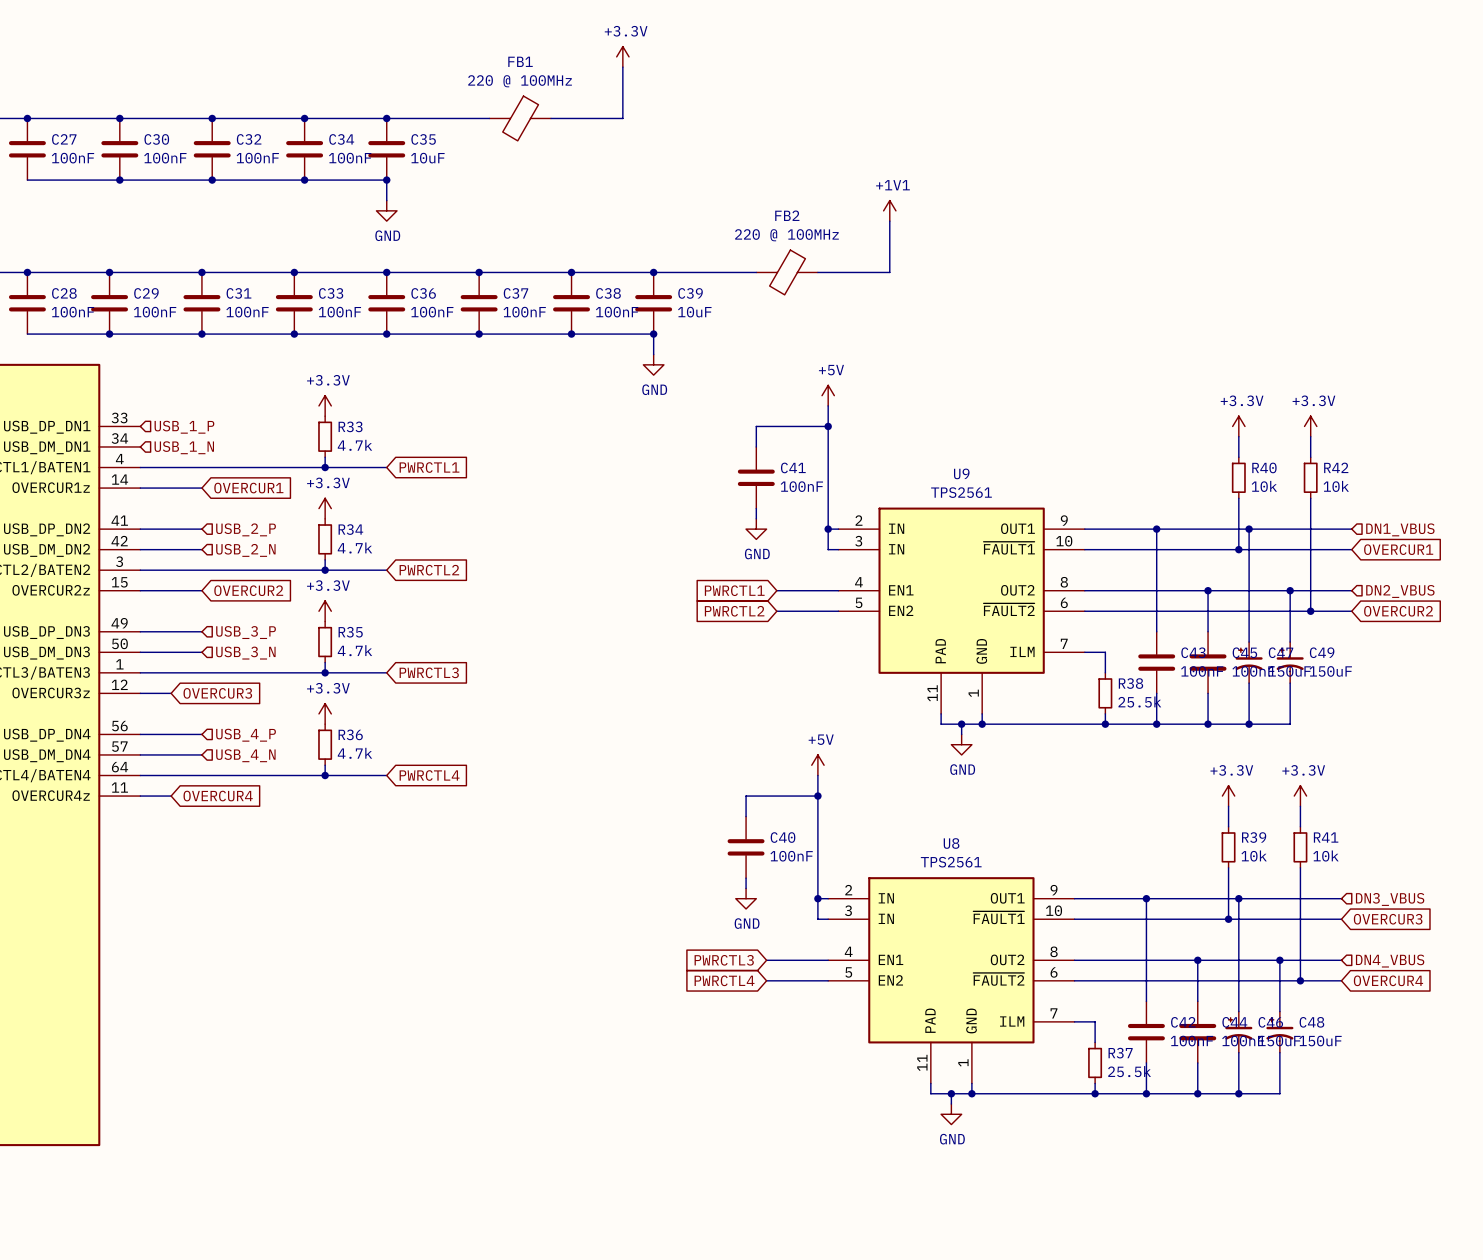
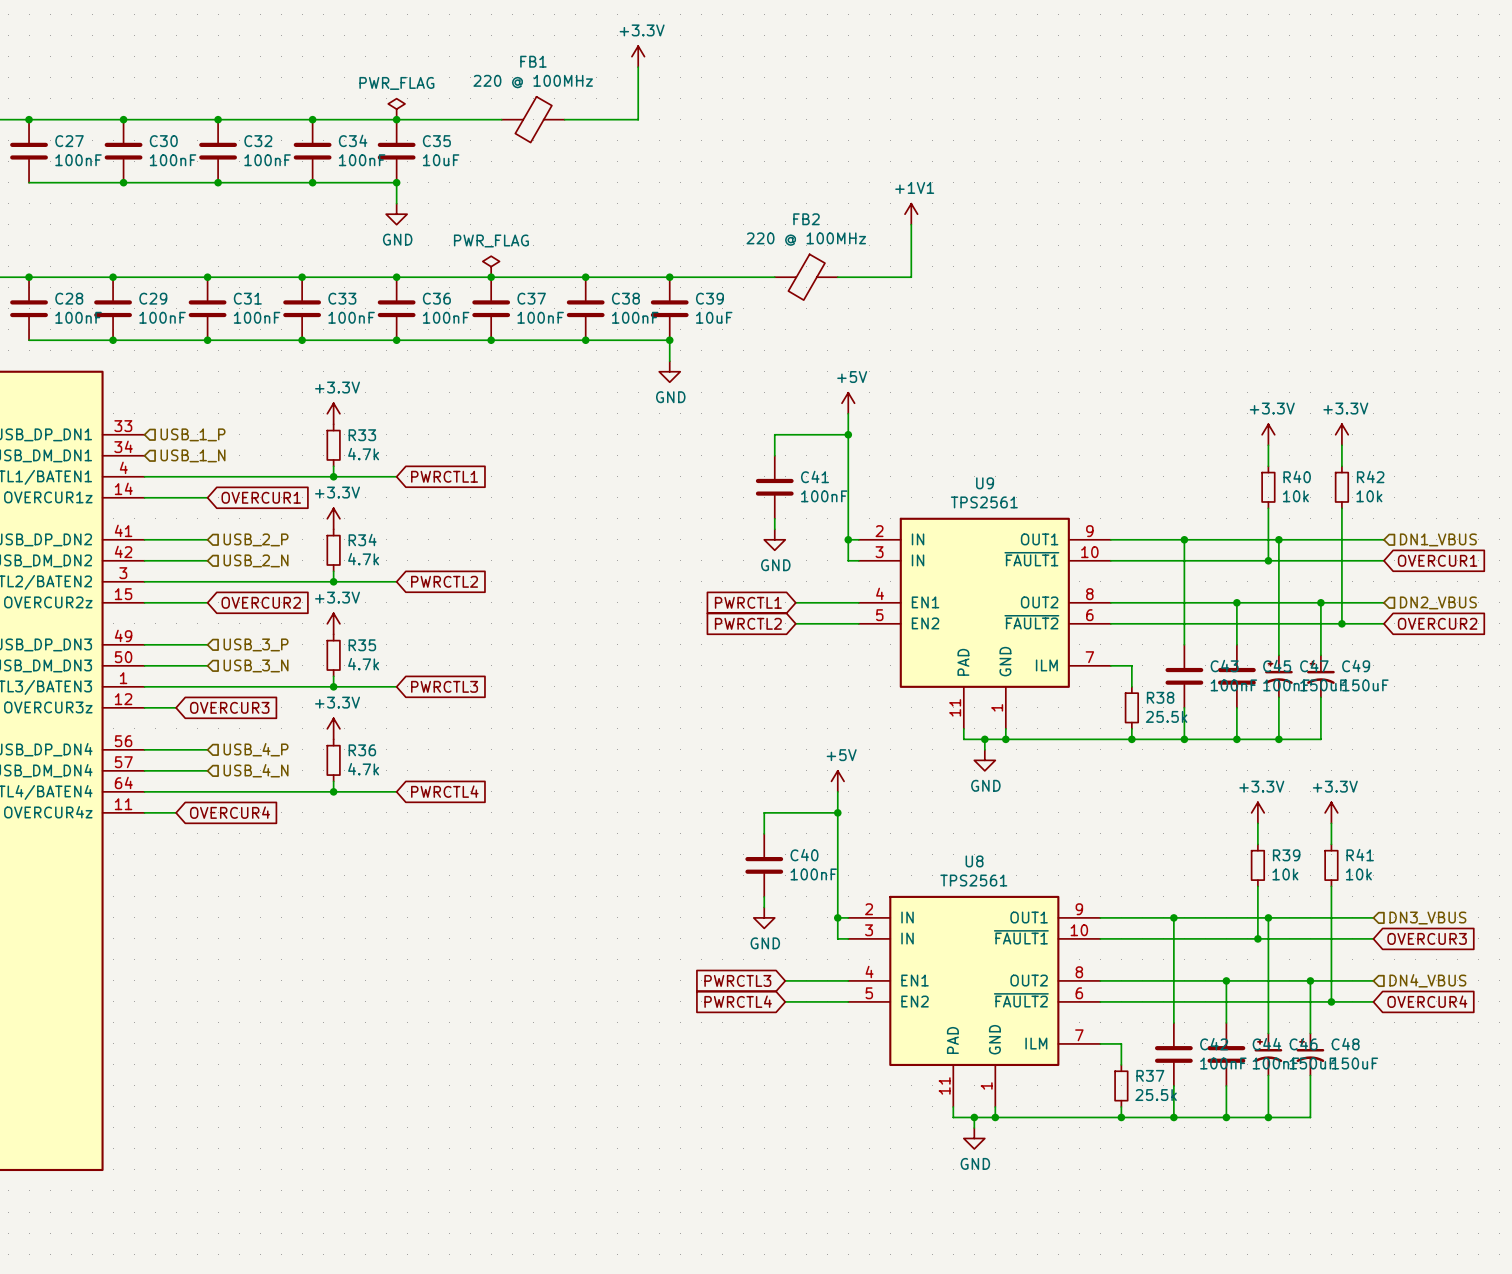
power symbol: none -> PWR_FLAG (396, 109)
power symbol: none -> PWR_FLAG (491, 266)

